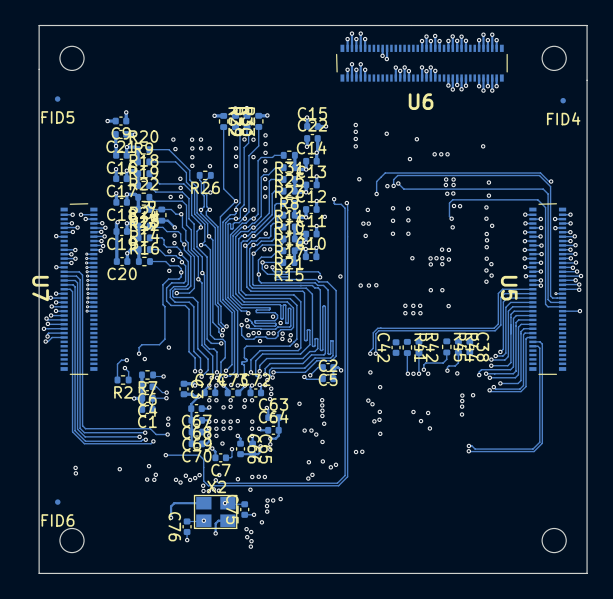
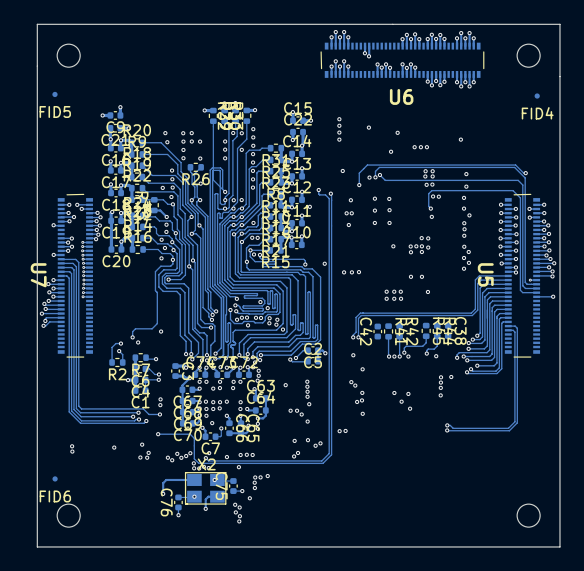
track: (236, 201) (220, 216) -> (222, 189) (222, 170) (220, 167) (212, 167) (210, 170) (210, 206)
track: (236, 213) (230, 214) (222, 222) -> (225, 203) (220, 203) (220, 171) (213, 170) (212, 211)
track: (235, 218) (230, 218) (225, 223) (225, 298) (237, 310) (237, 374) -> (225, 208) (217, 208) (217, 194) (215, 193) (215, 285) (226, 296) (226, 341) (228, 341) (228, 323) (230, 323) (230, 342) (228, 344) (226, 357)

